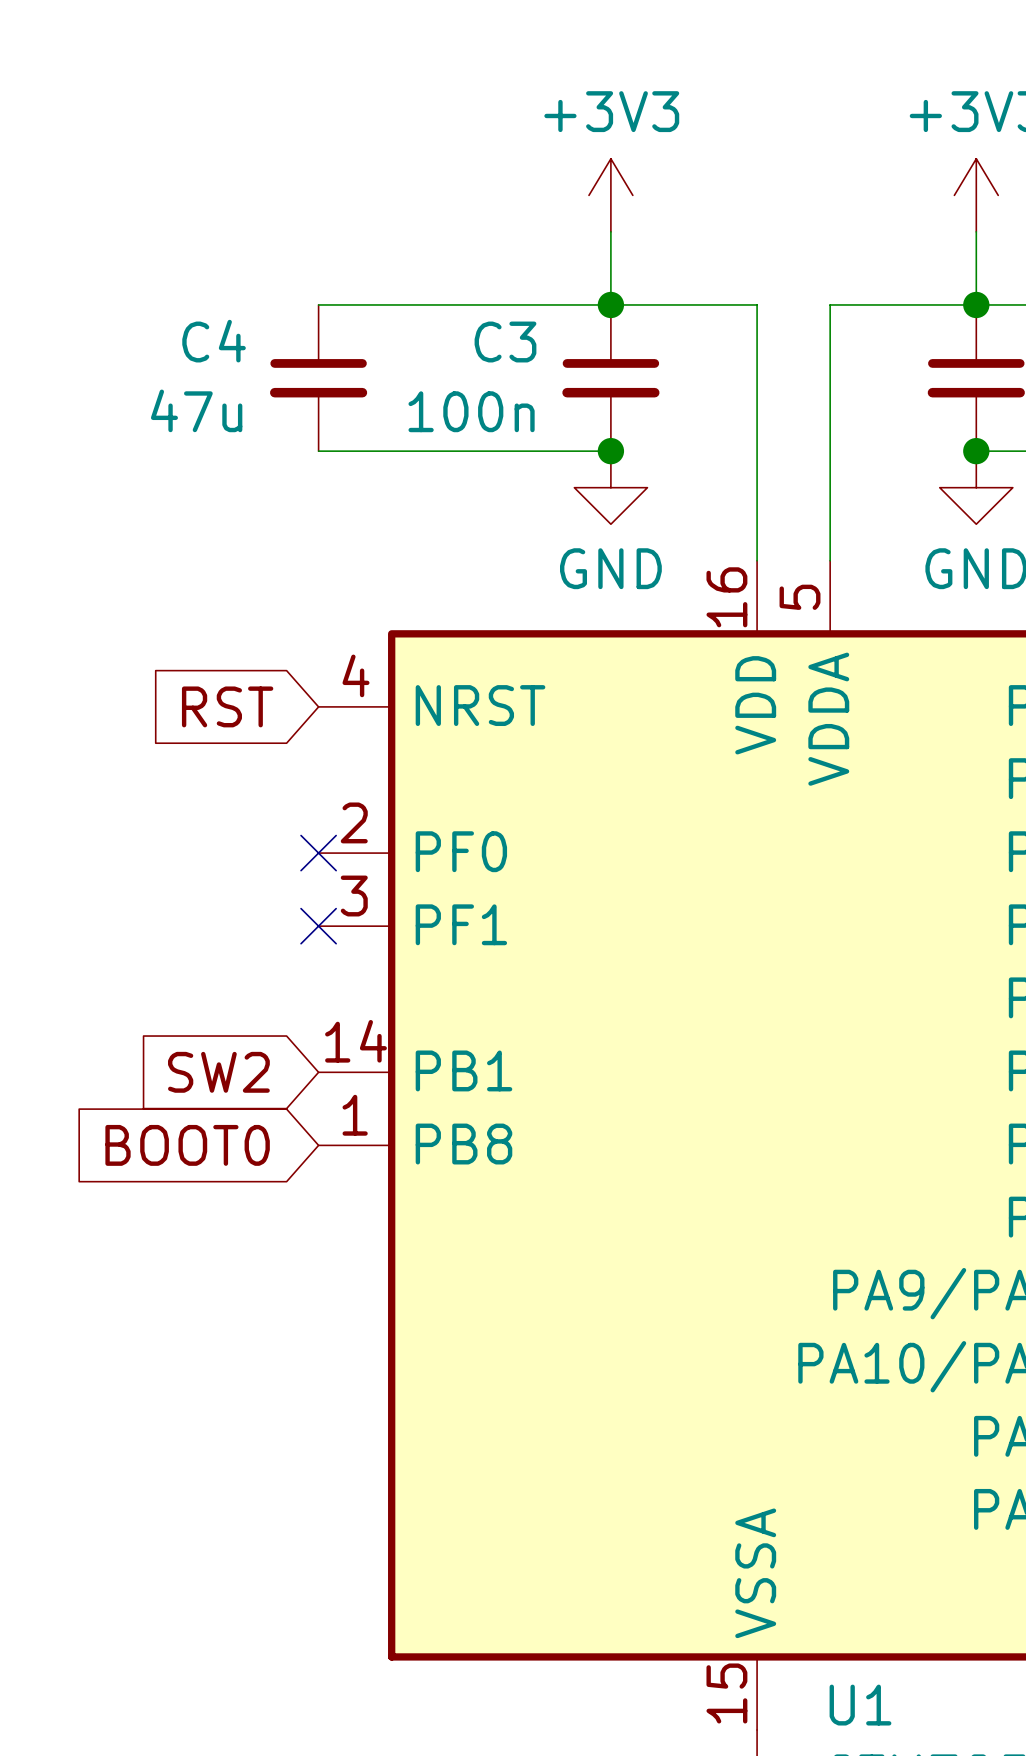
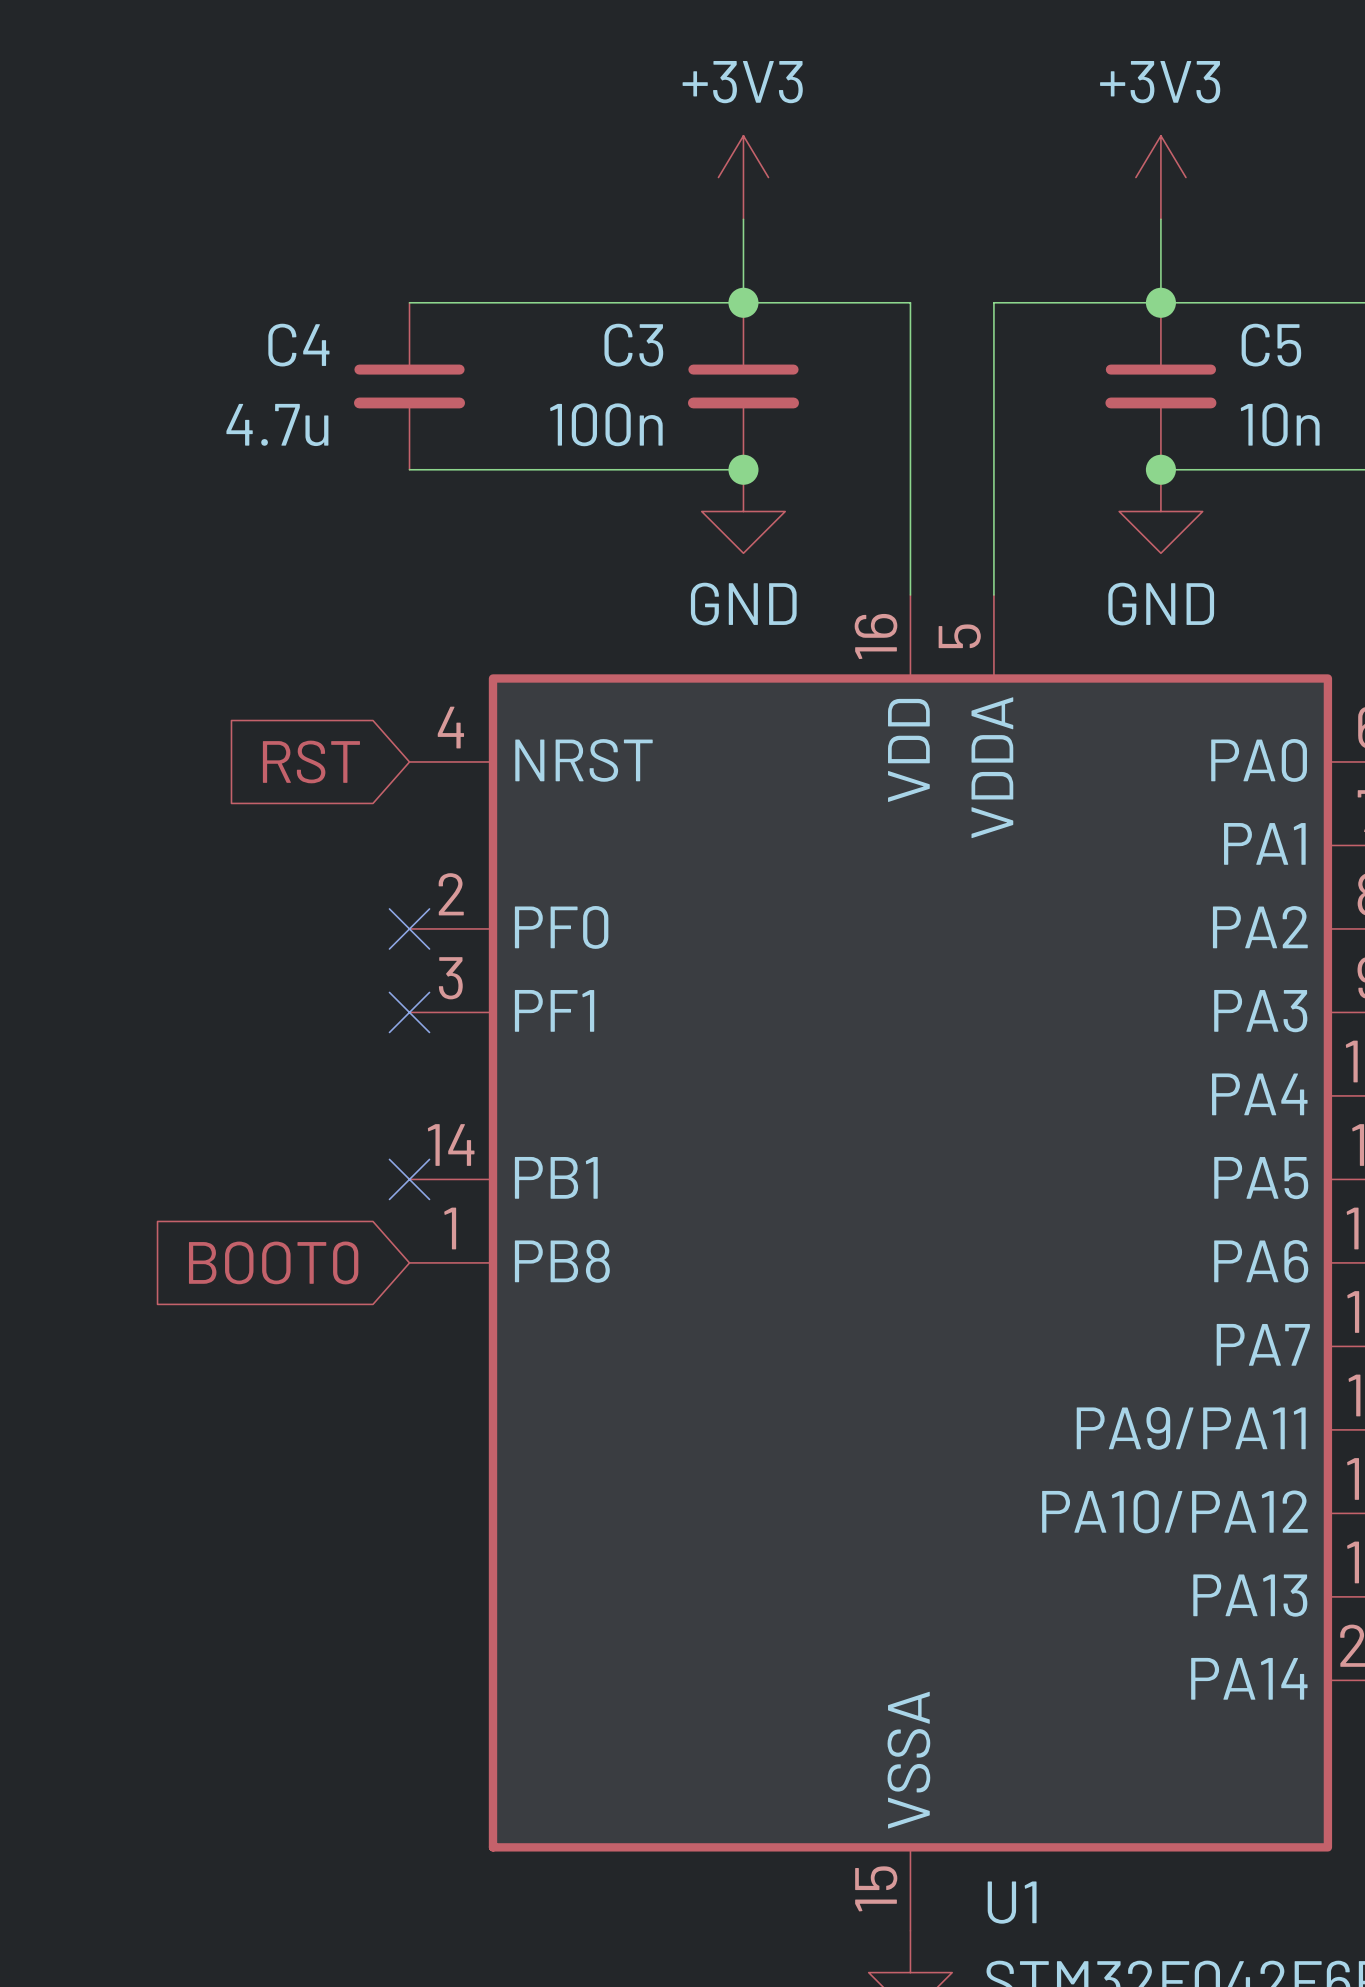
C4 value: 47u (196, 410) -> 4.7u (277, 424)
global label: SW2 (218, 1072) -> none
no-connect mark: none -> (409, 1179)

